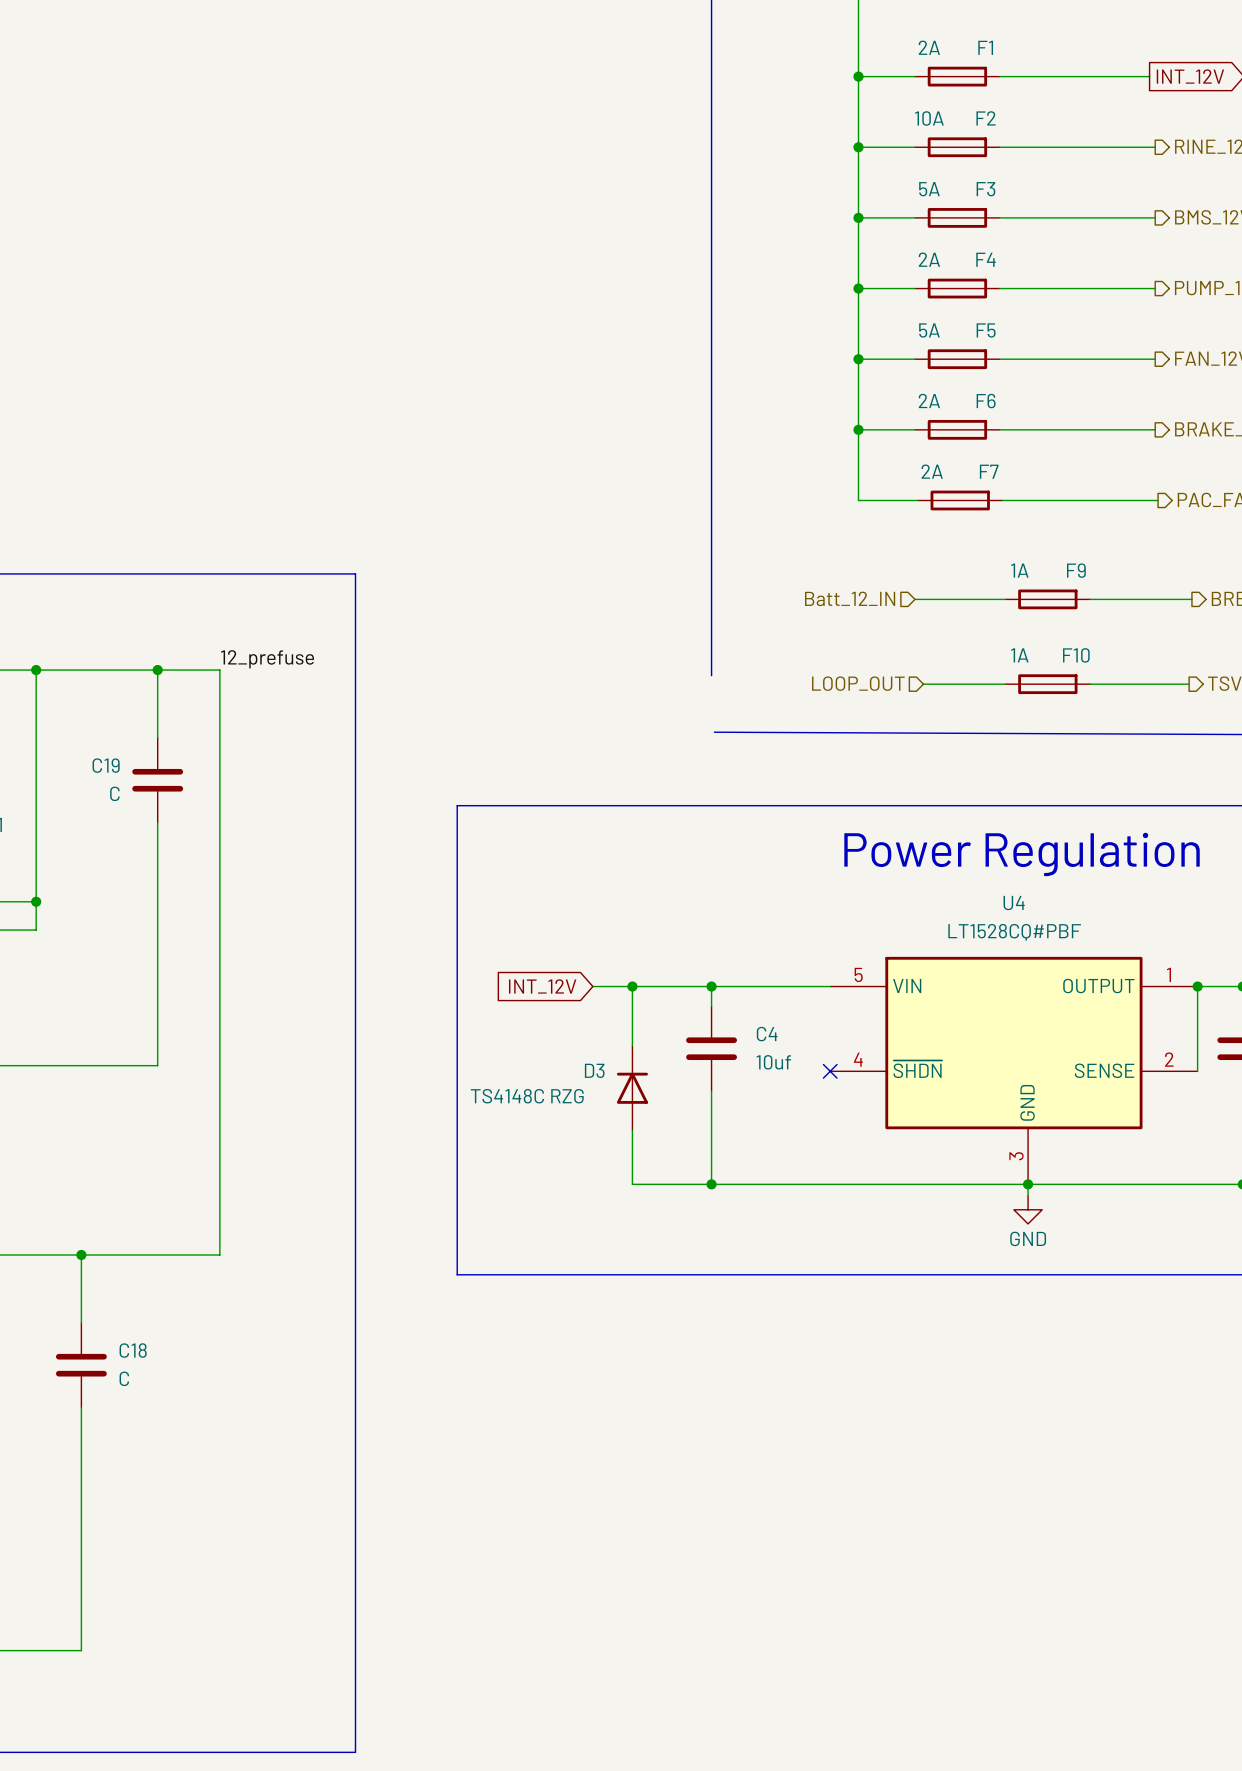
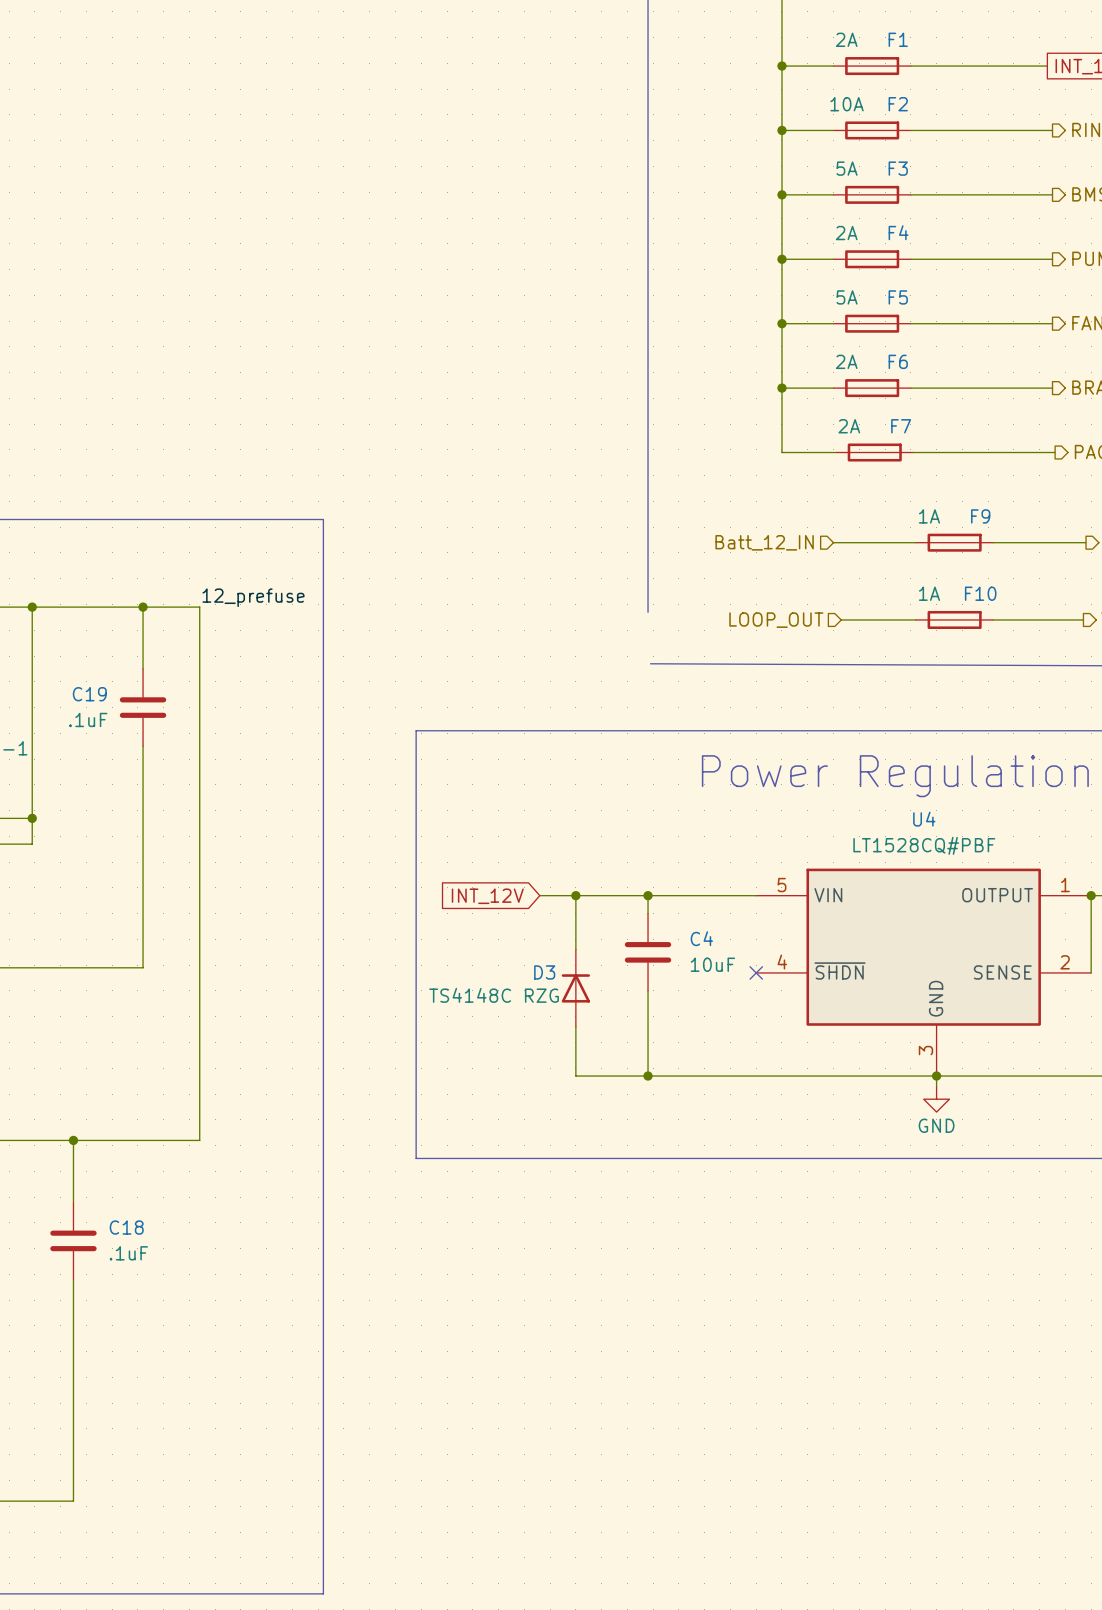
C19 value: C (114, 793) -> .1uF (88, 719)
C4 value: 10uf (773, 1062) -> 10uF (712, 964)
C18 value: C (124, 1378) -> .1uF (128, 1253)

